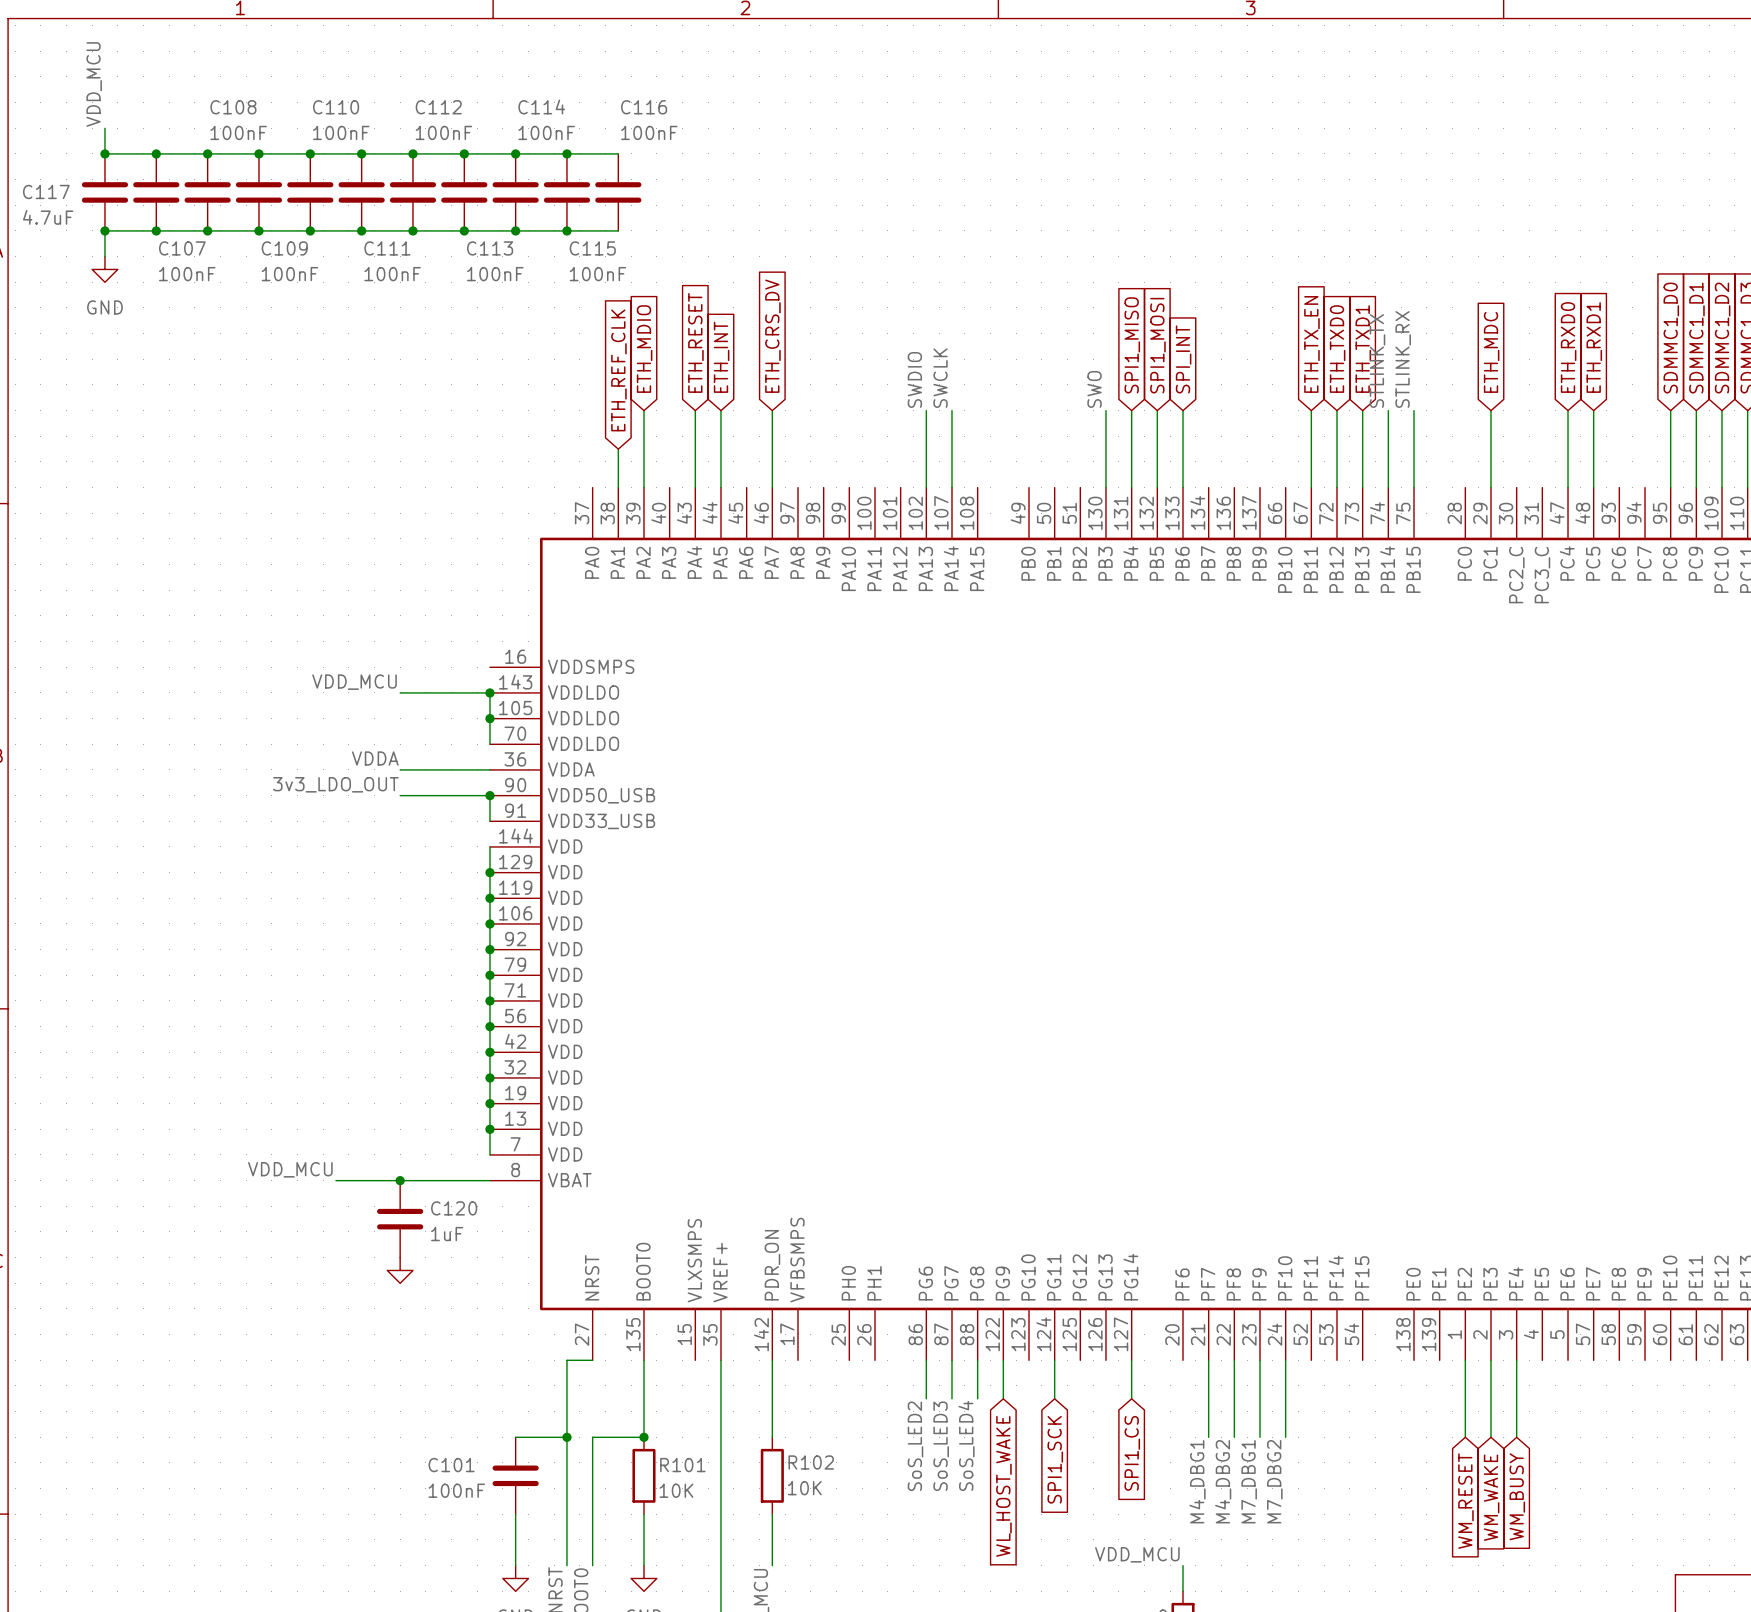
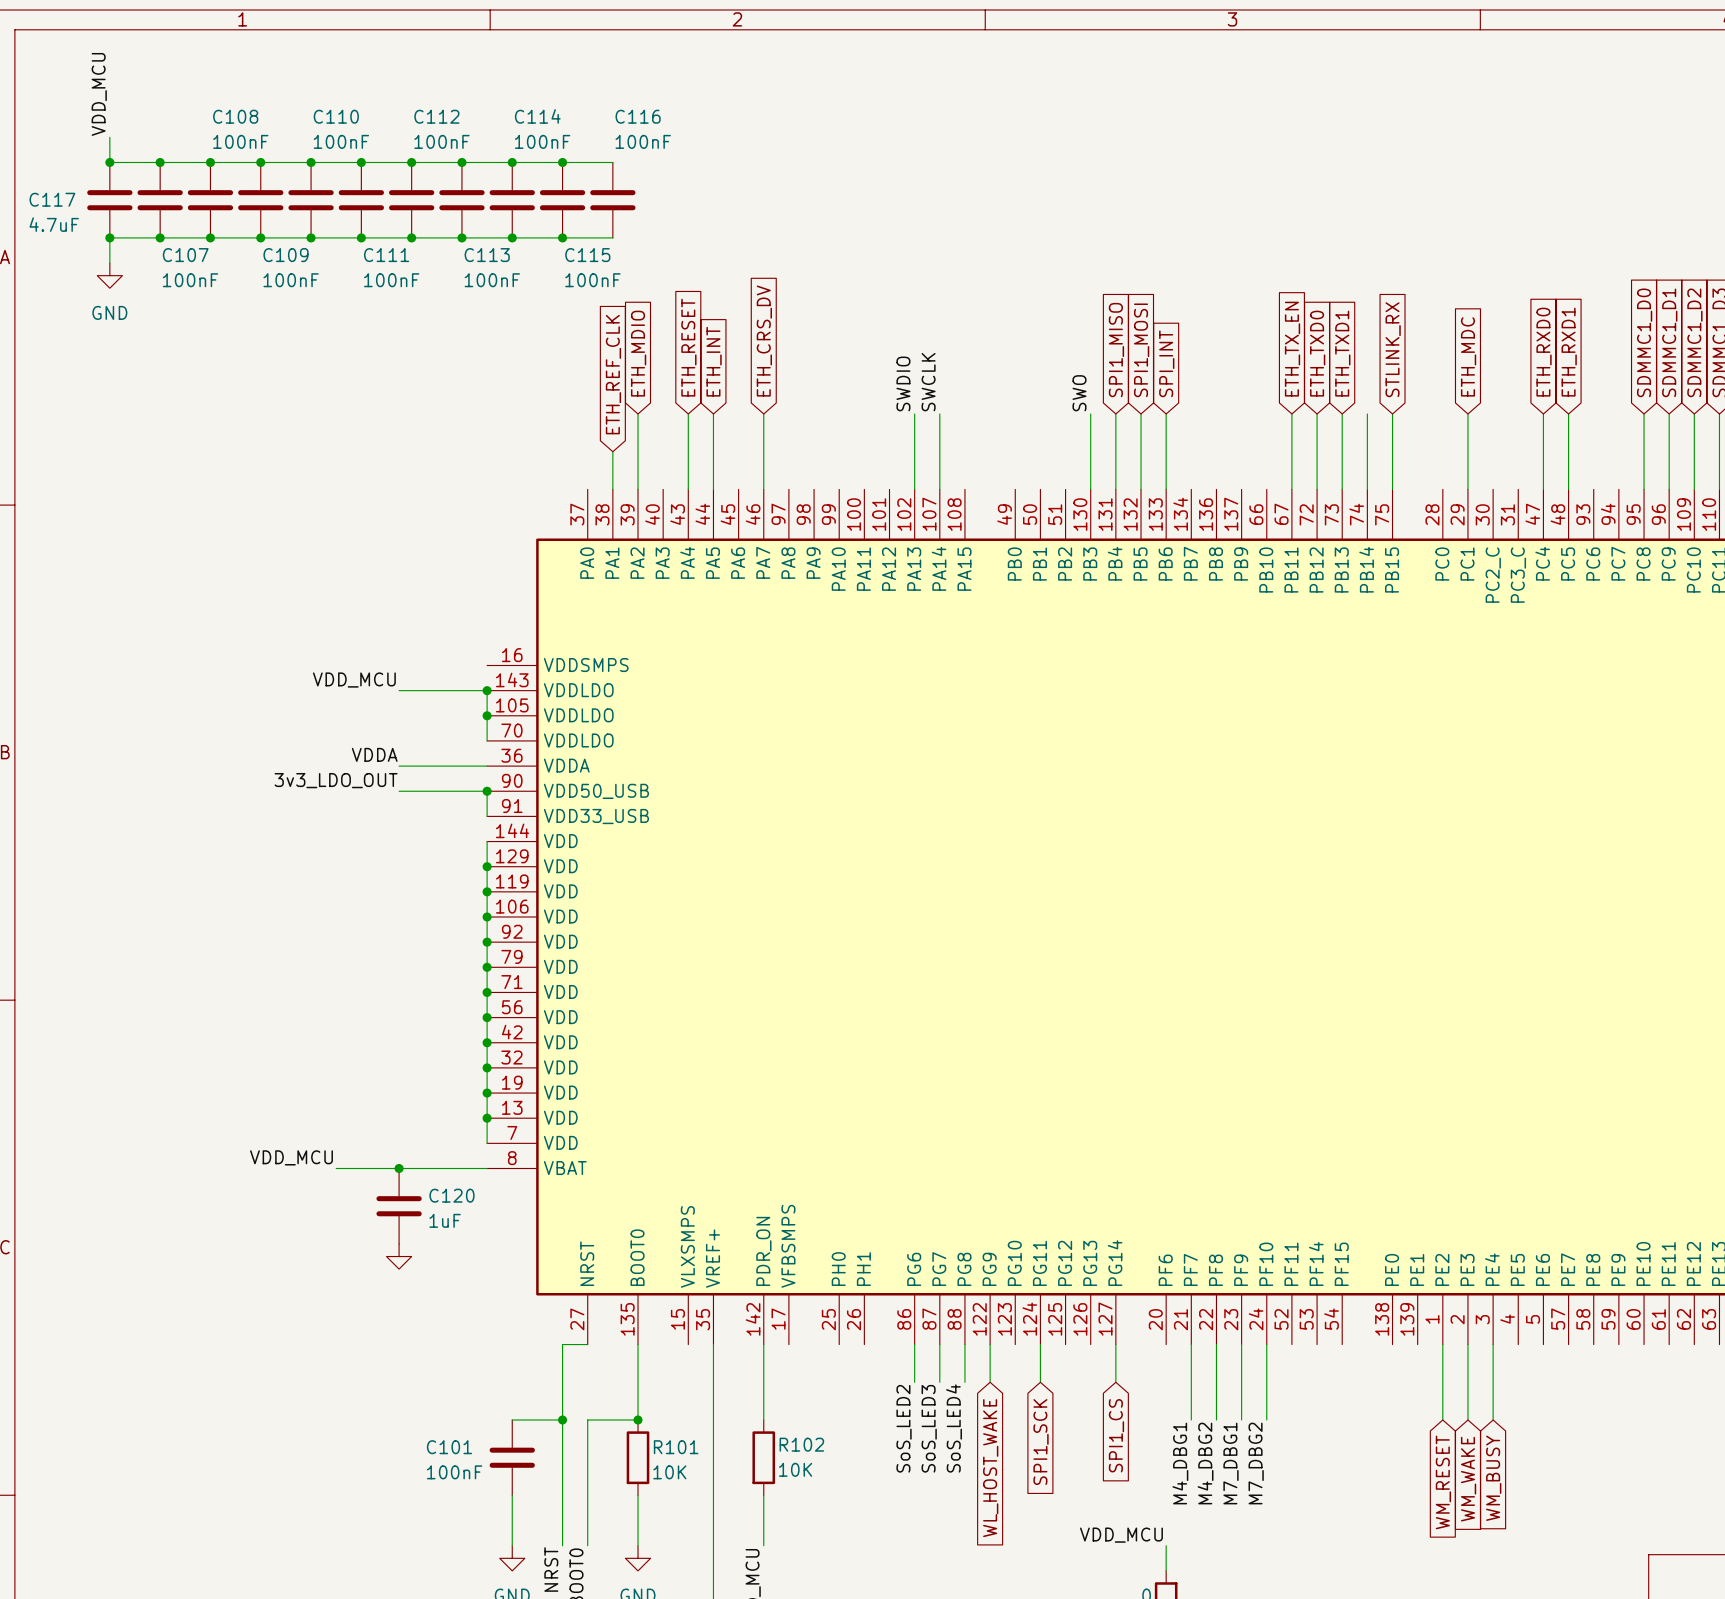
global label: none -> STLINK_RX (1393, 349)
label: STLINK_RX (1403, 359) -> none
label: STLINK_TX (1377, 361) -> none

